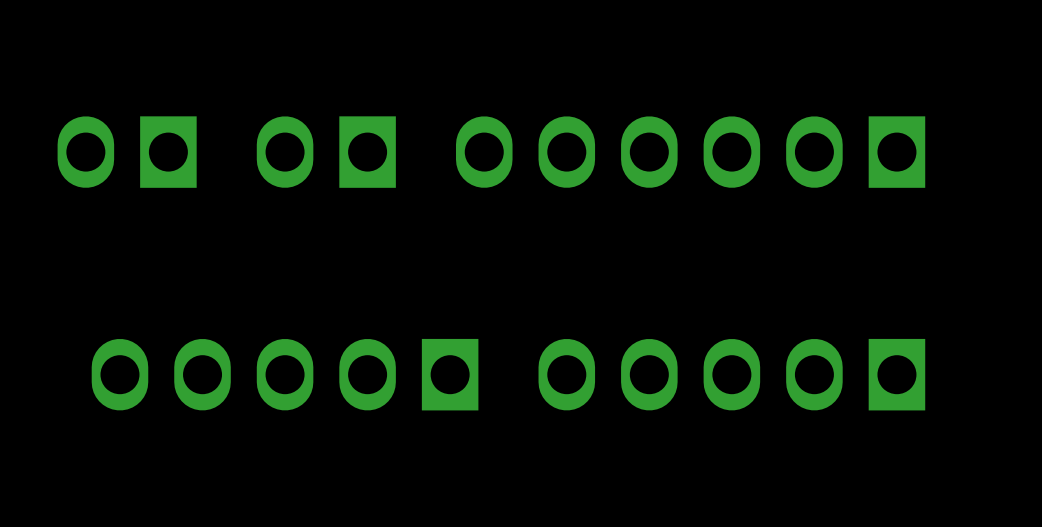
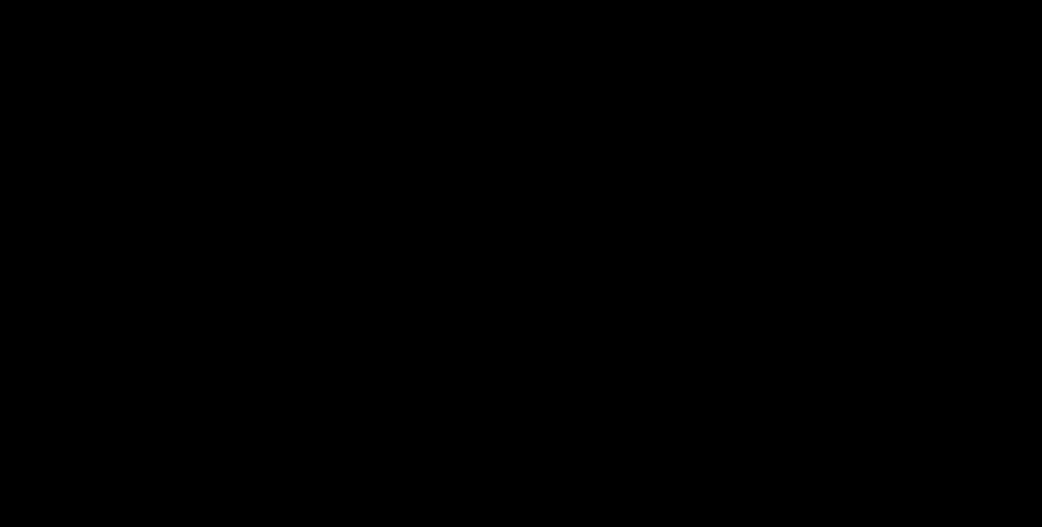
part: (127, 152) -> none
part: (326, 152) -> none
part: (690, 152) -> none
part: (285, 374) -> none
part: (731, 374) -> none

